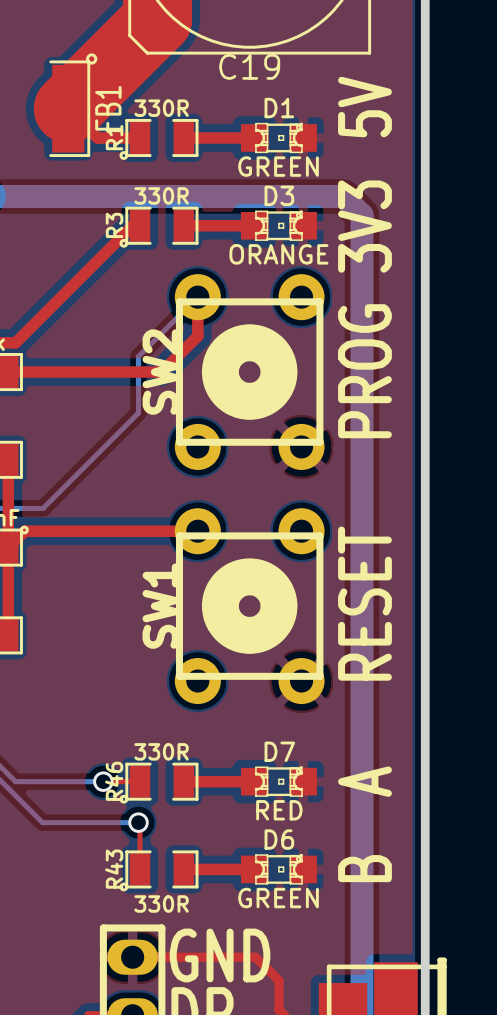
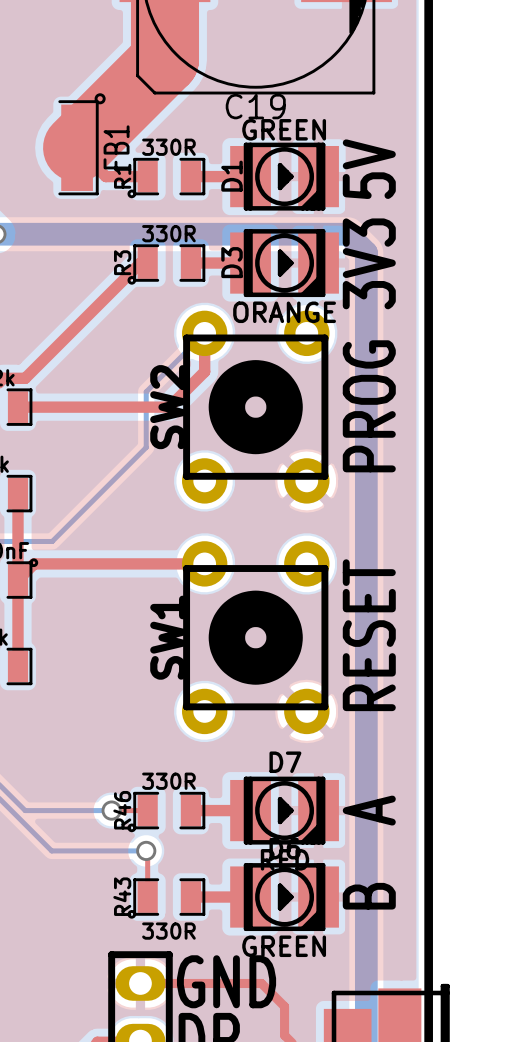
text position: 5V (364, 107) -> 5V (369, 169)
D1 name position: D1 (279, 108) -> D1 (232, 176)
D1 footprint: [240, 122, 317, 154] -> [230, 142, 339, 211]
D1 value position: GREEN (278, 166) -> GREEN (284, 129)
D3 name position: D3 (279, 195) -> D3 (232, 262)
D3 footprint: [240, 210, 317, 241] -> [230, 229, 339, 298]
D7 footprint: [240, 766, 317, 797] -> [230, 776, 339, 845]
D6 footprint: [240, 854, 317, 885] -> [230, 863, 339, 932]

